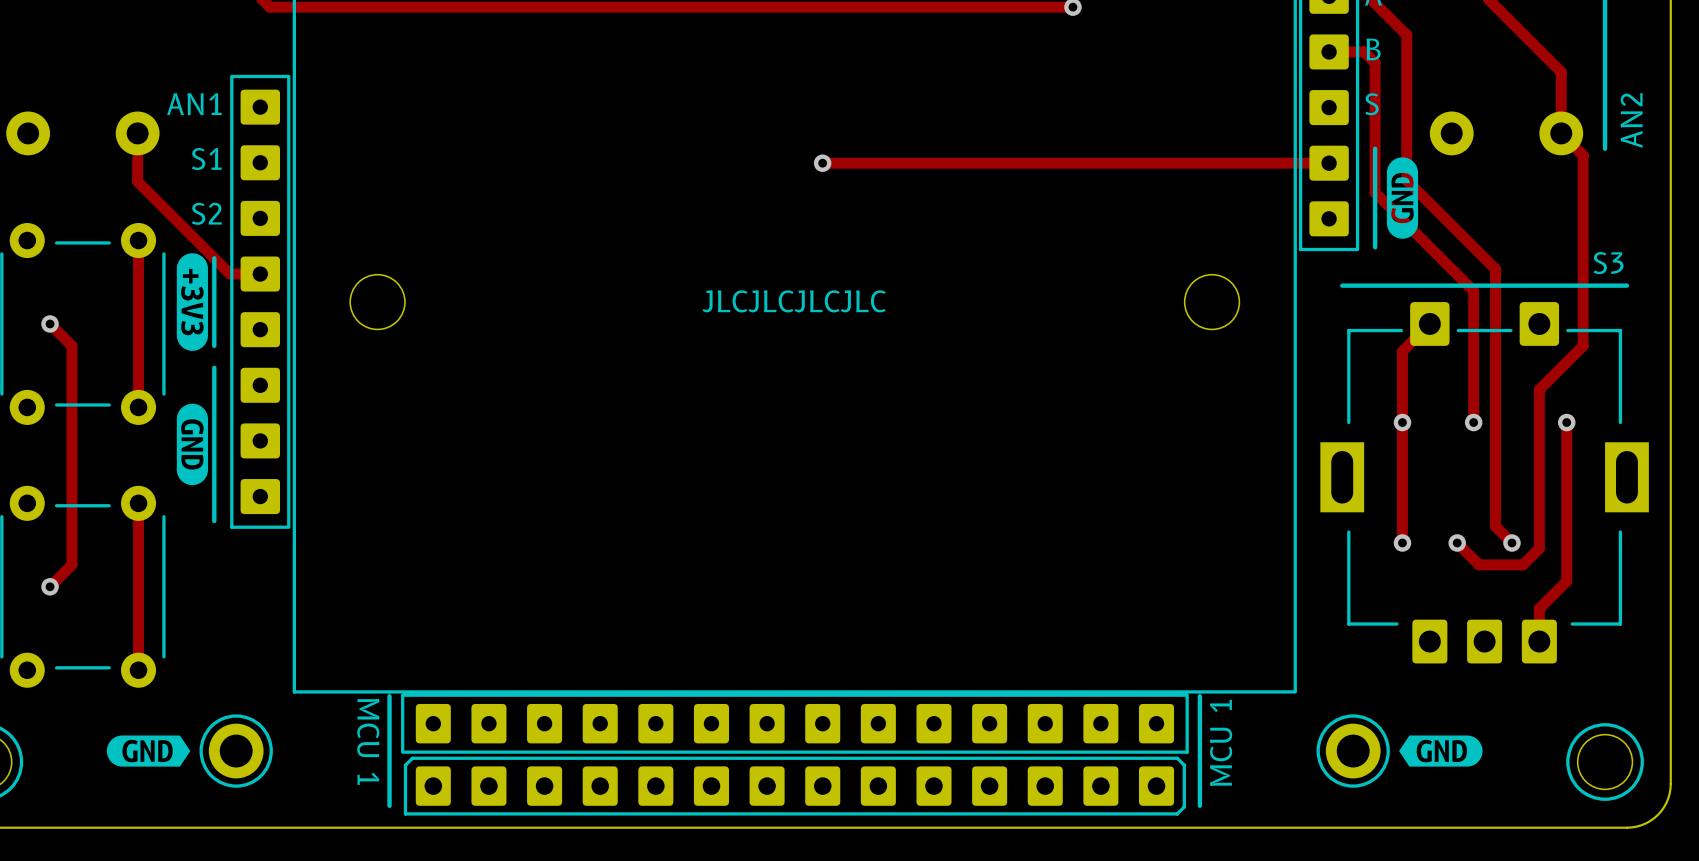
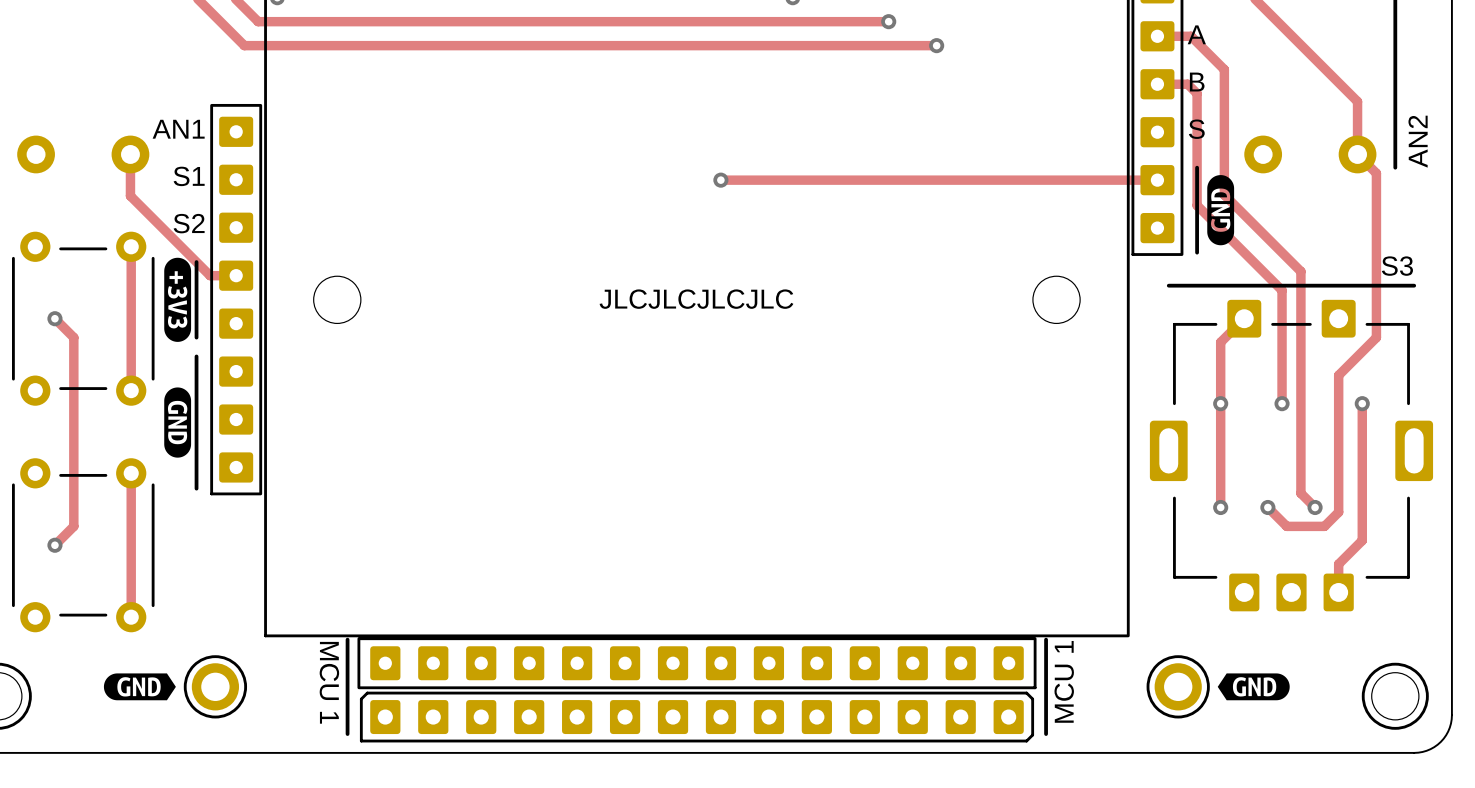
part footprint: [1320, 302, 1649, 664] -> [1149, 299, 1434, 612]

